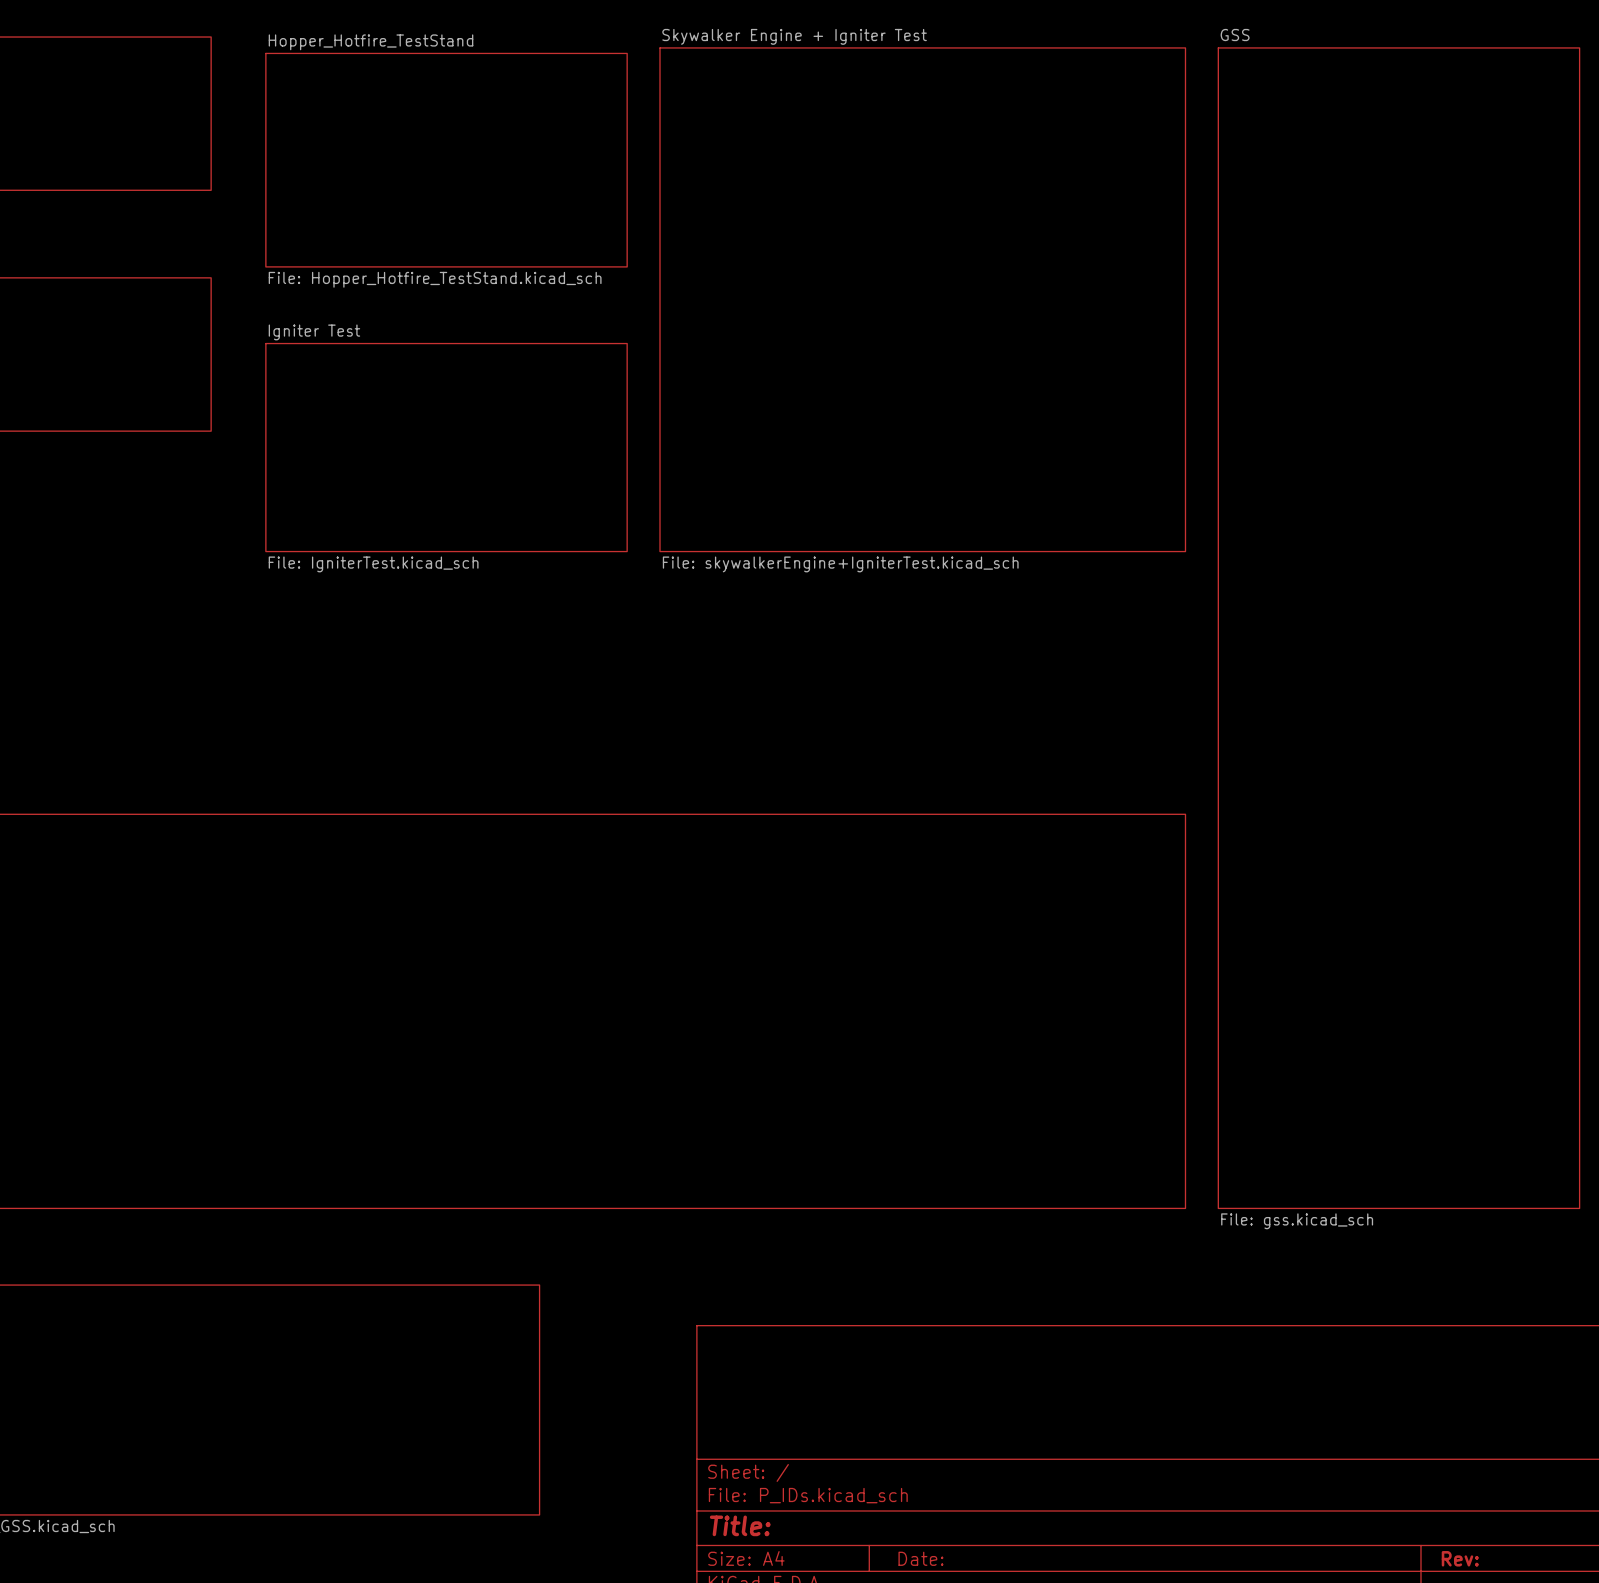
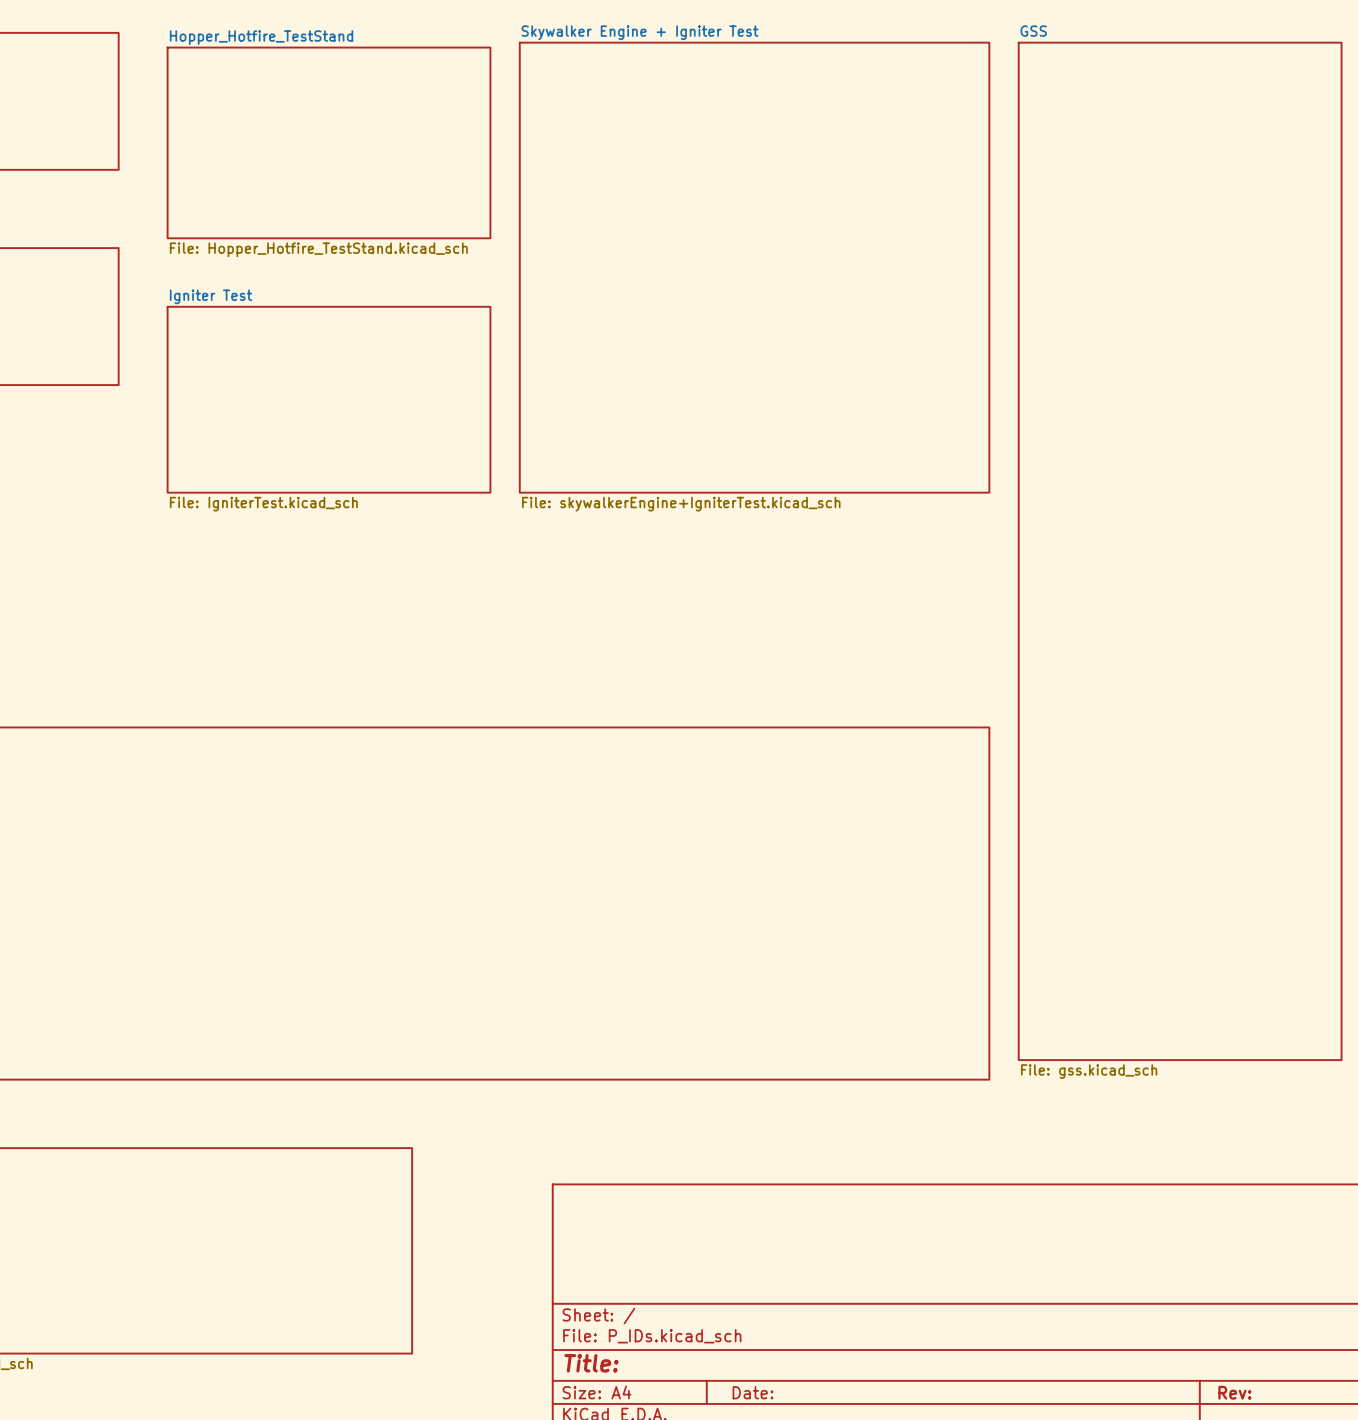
sheet GSS: none -> File: gss.kicad_sch (1180, 551)
sheet GSS: File: gss.kicad_sch (1398, 628) -> none

